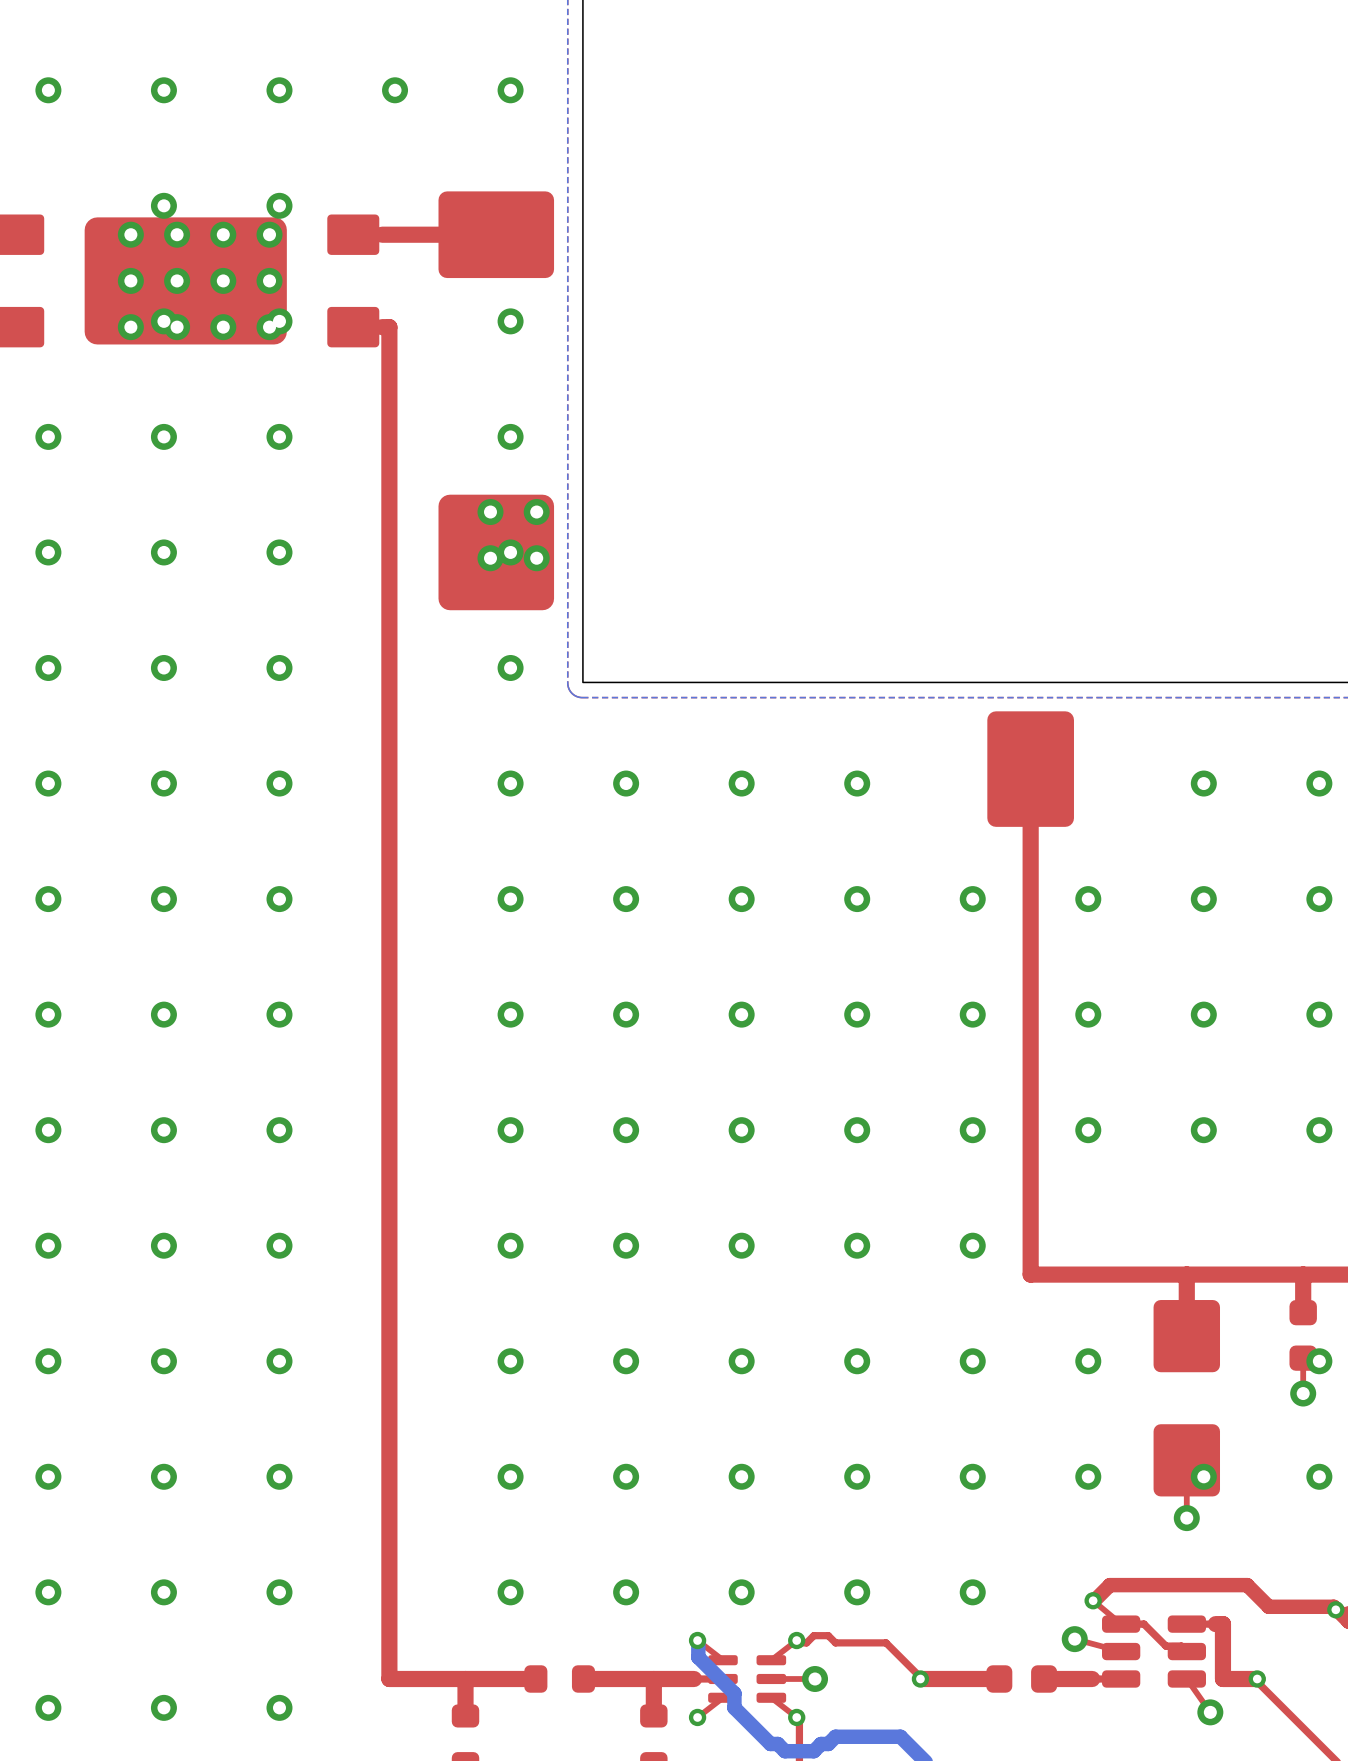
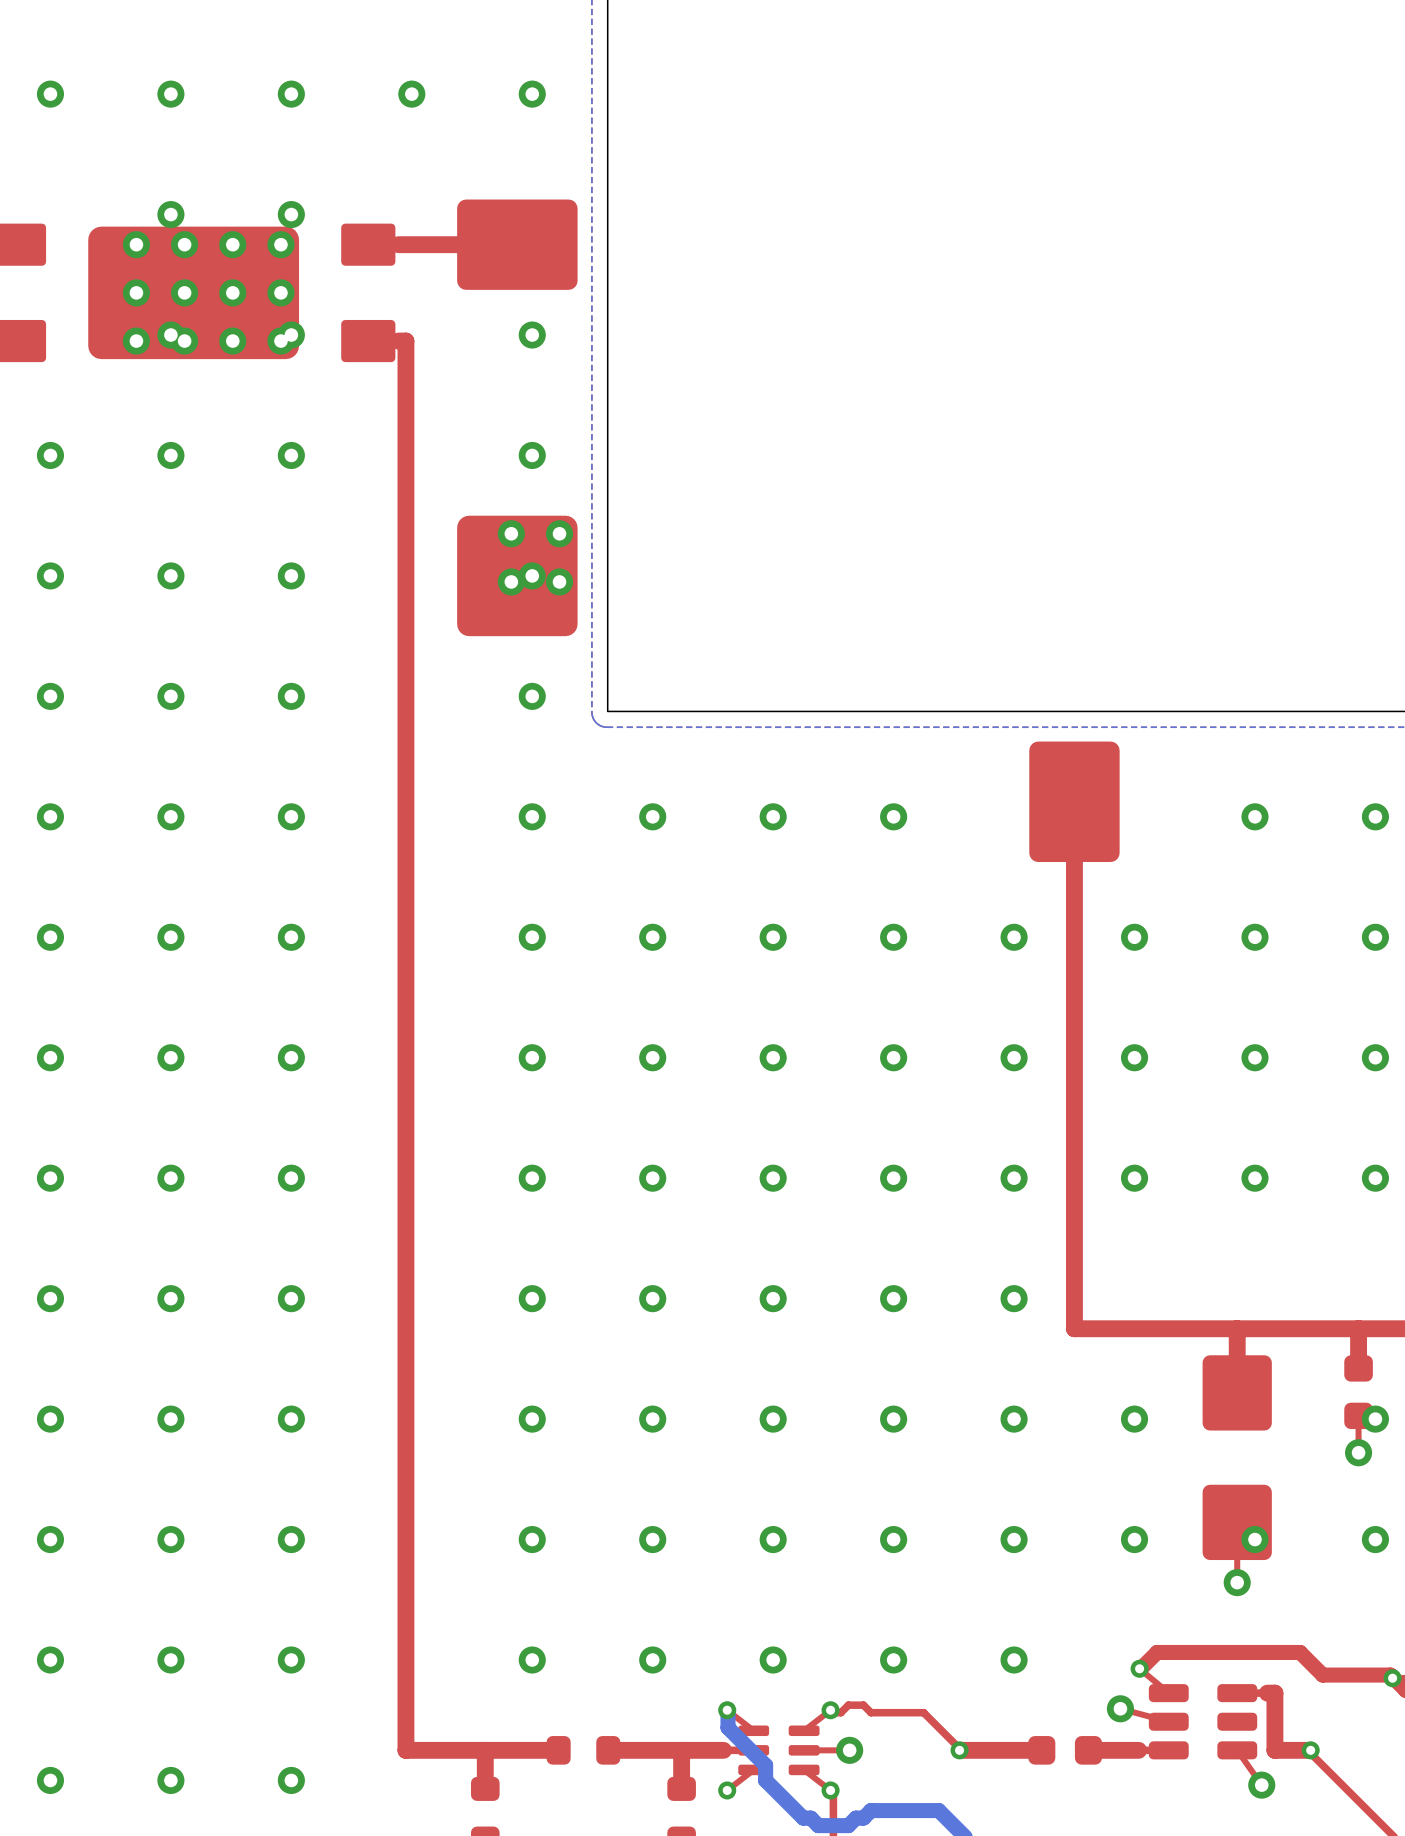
top track: (1121, 1624) (1143, 1624) (1165, 1646) (1181, 1646) (1186, 1651) -> none

